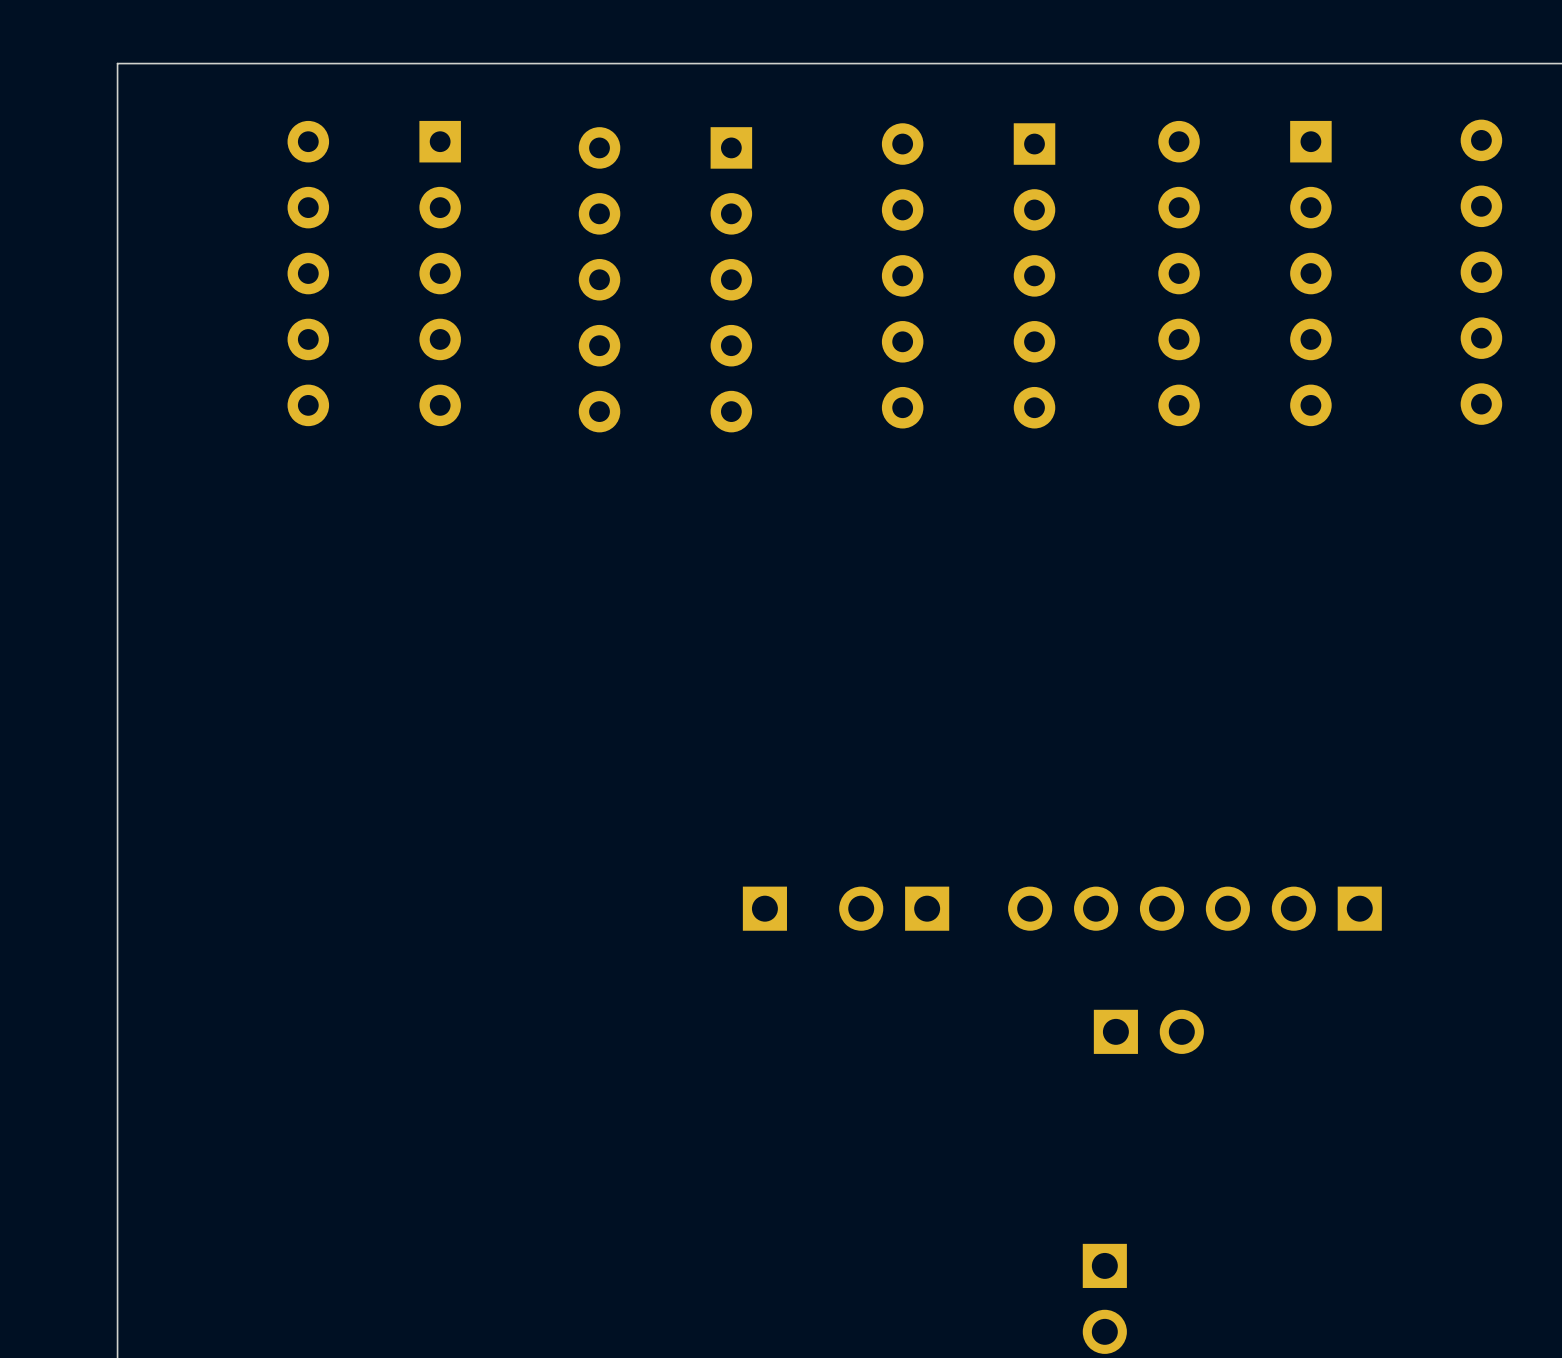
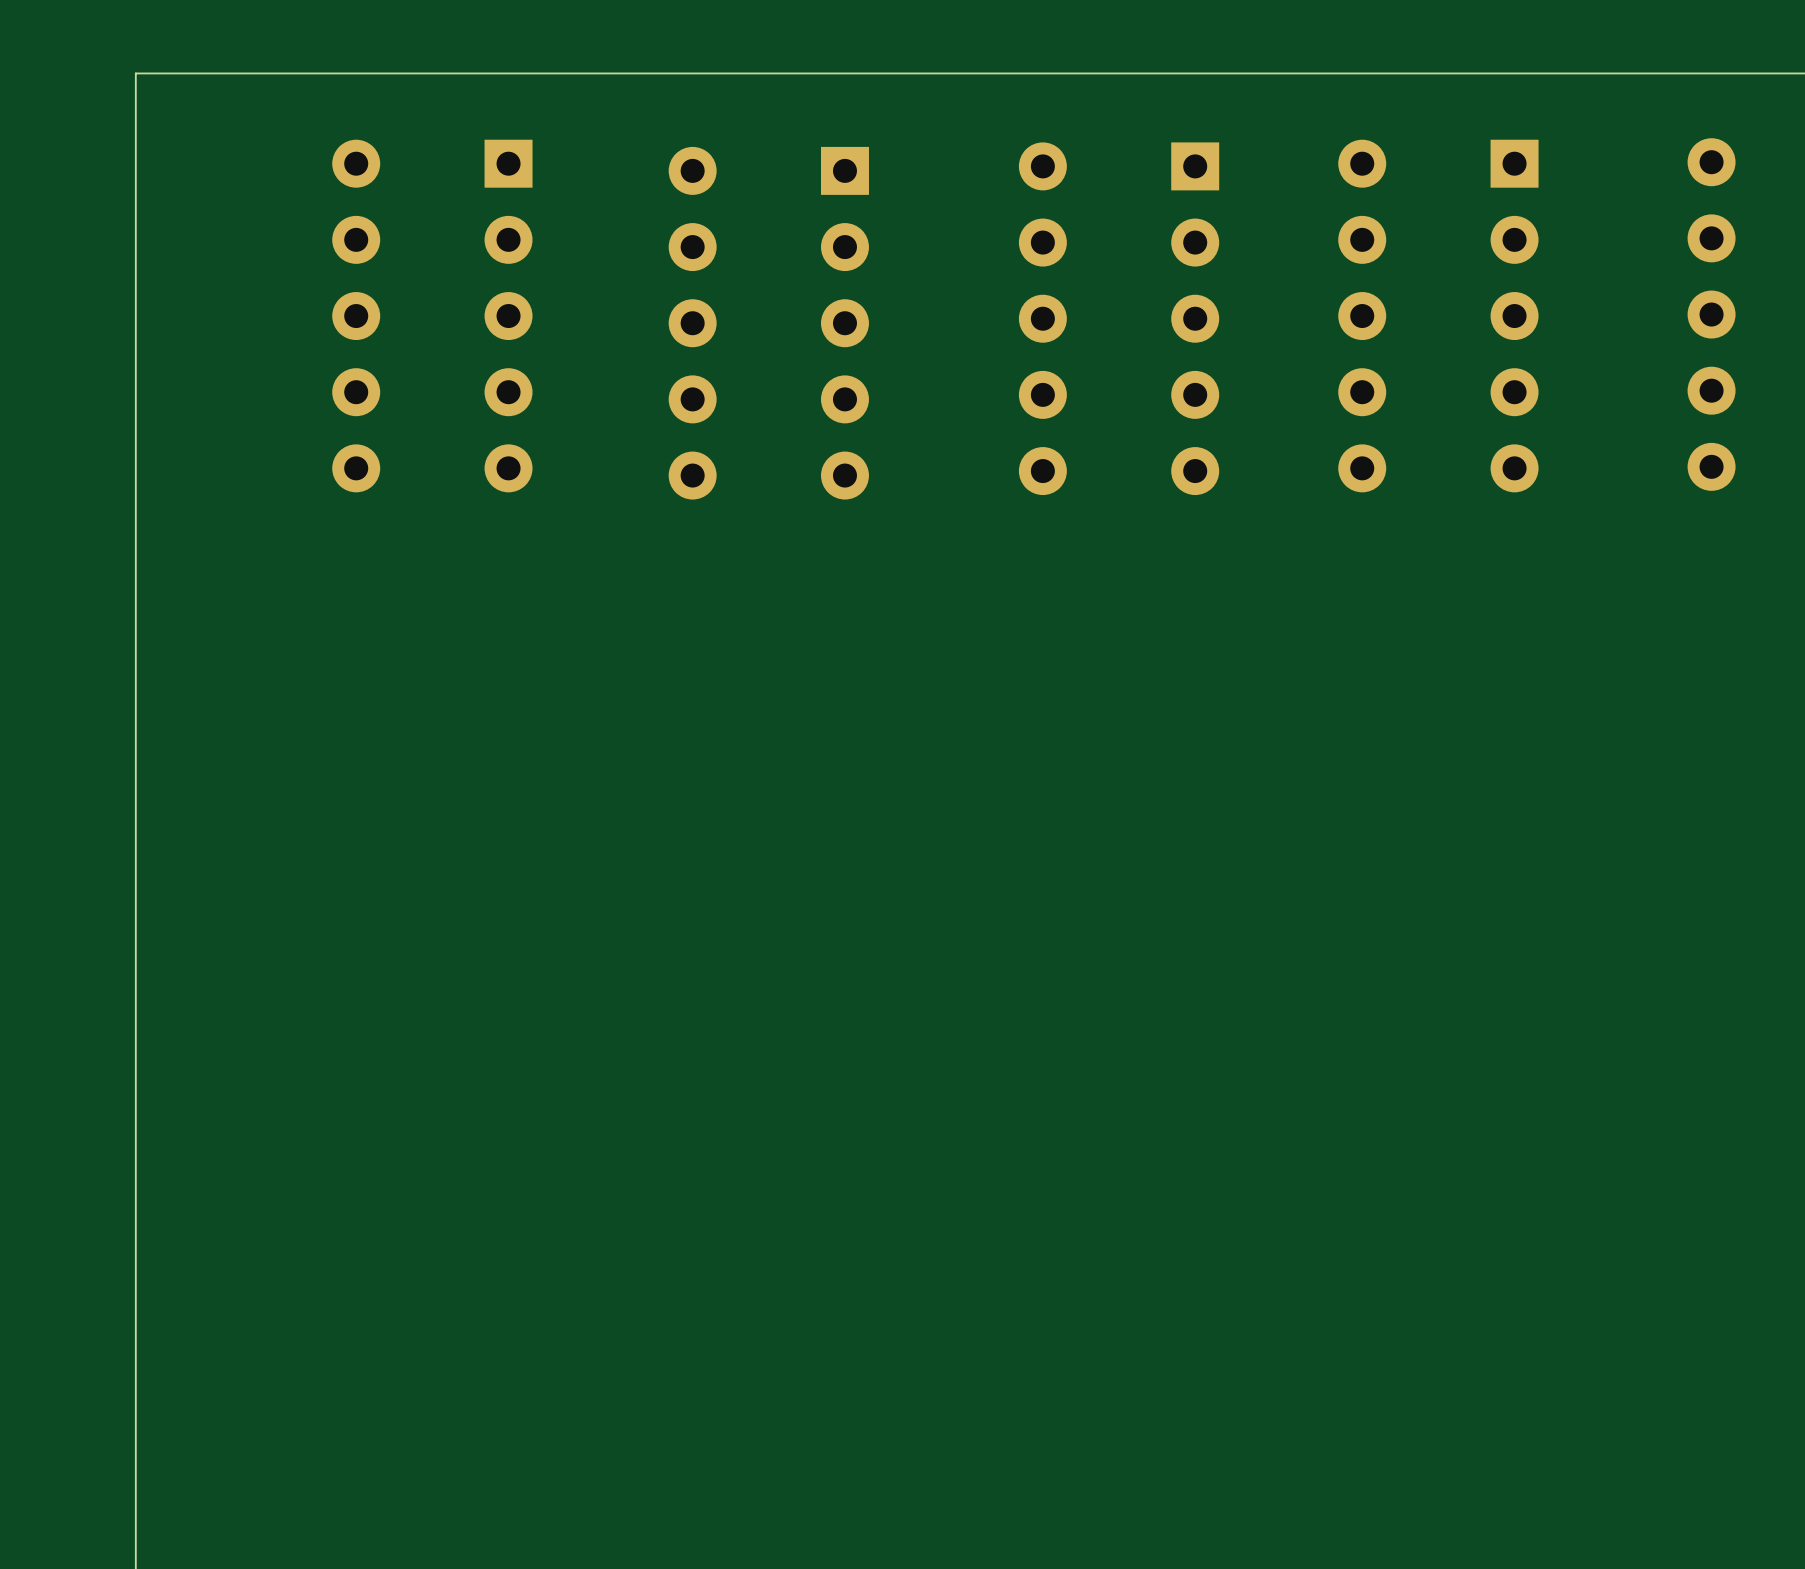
part: (764, 908) -> none
part: (894, 908) -> none
part: (1194, 908) -> none
part: (1148, 1031) -> none
part: (1104, 1298) -> none

